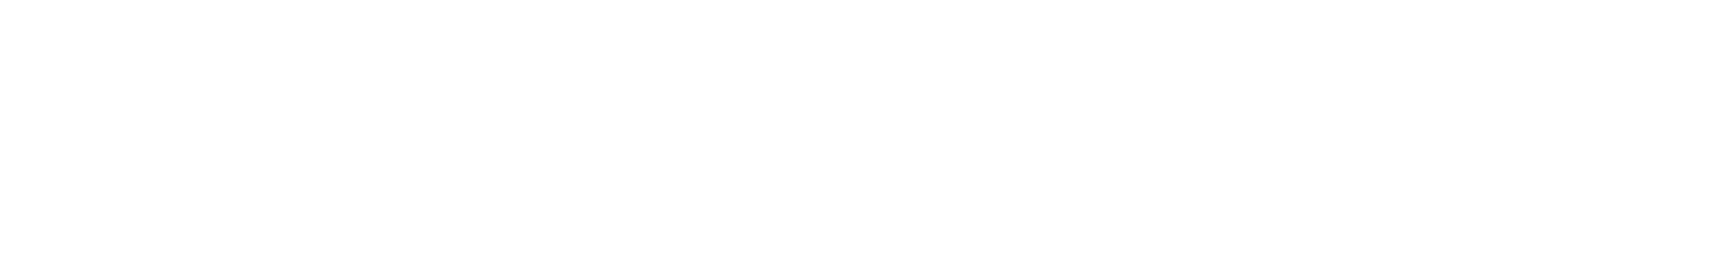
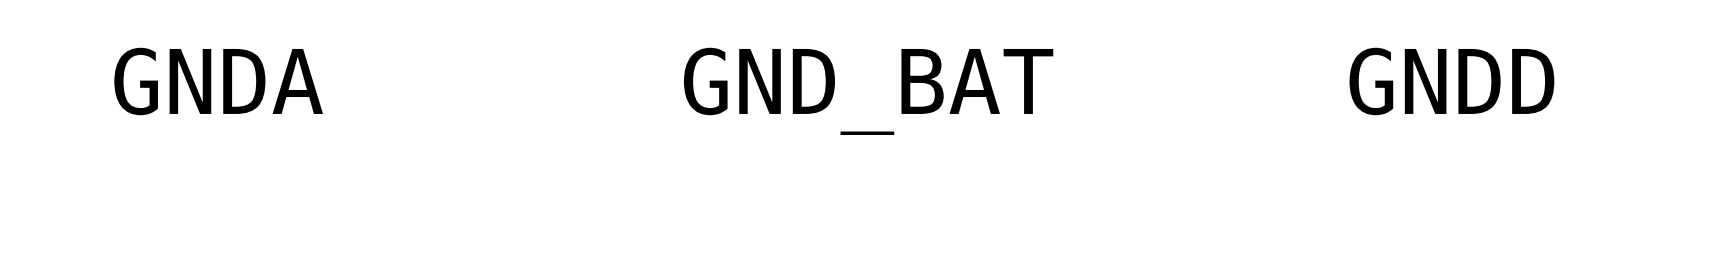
text: none -> GNDA (218, 81)
text: none -> GNDD (1451, 81)
text: none -> GND_BAT (868, 91)

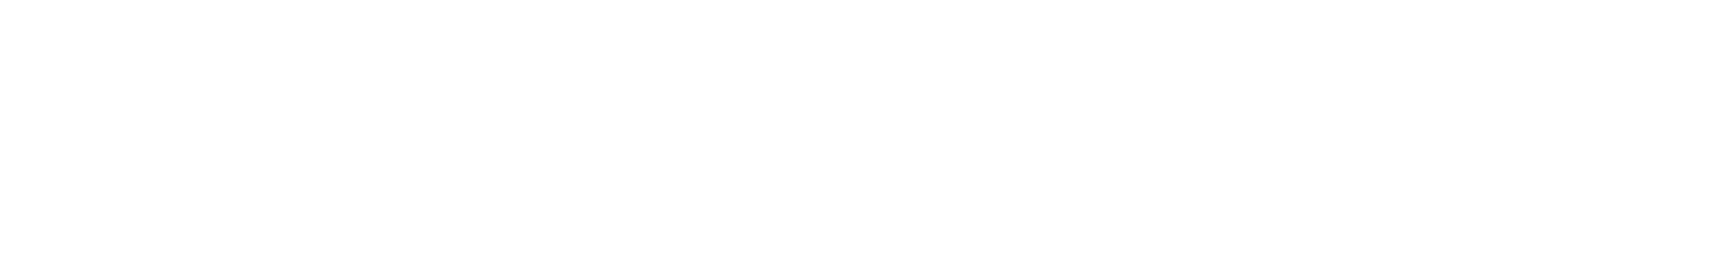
text: GNDA (218, 81) -> none
text: GNDD (1451, 81) -> none
text: GND_BAT (868, 91) -> none

